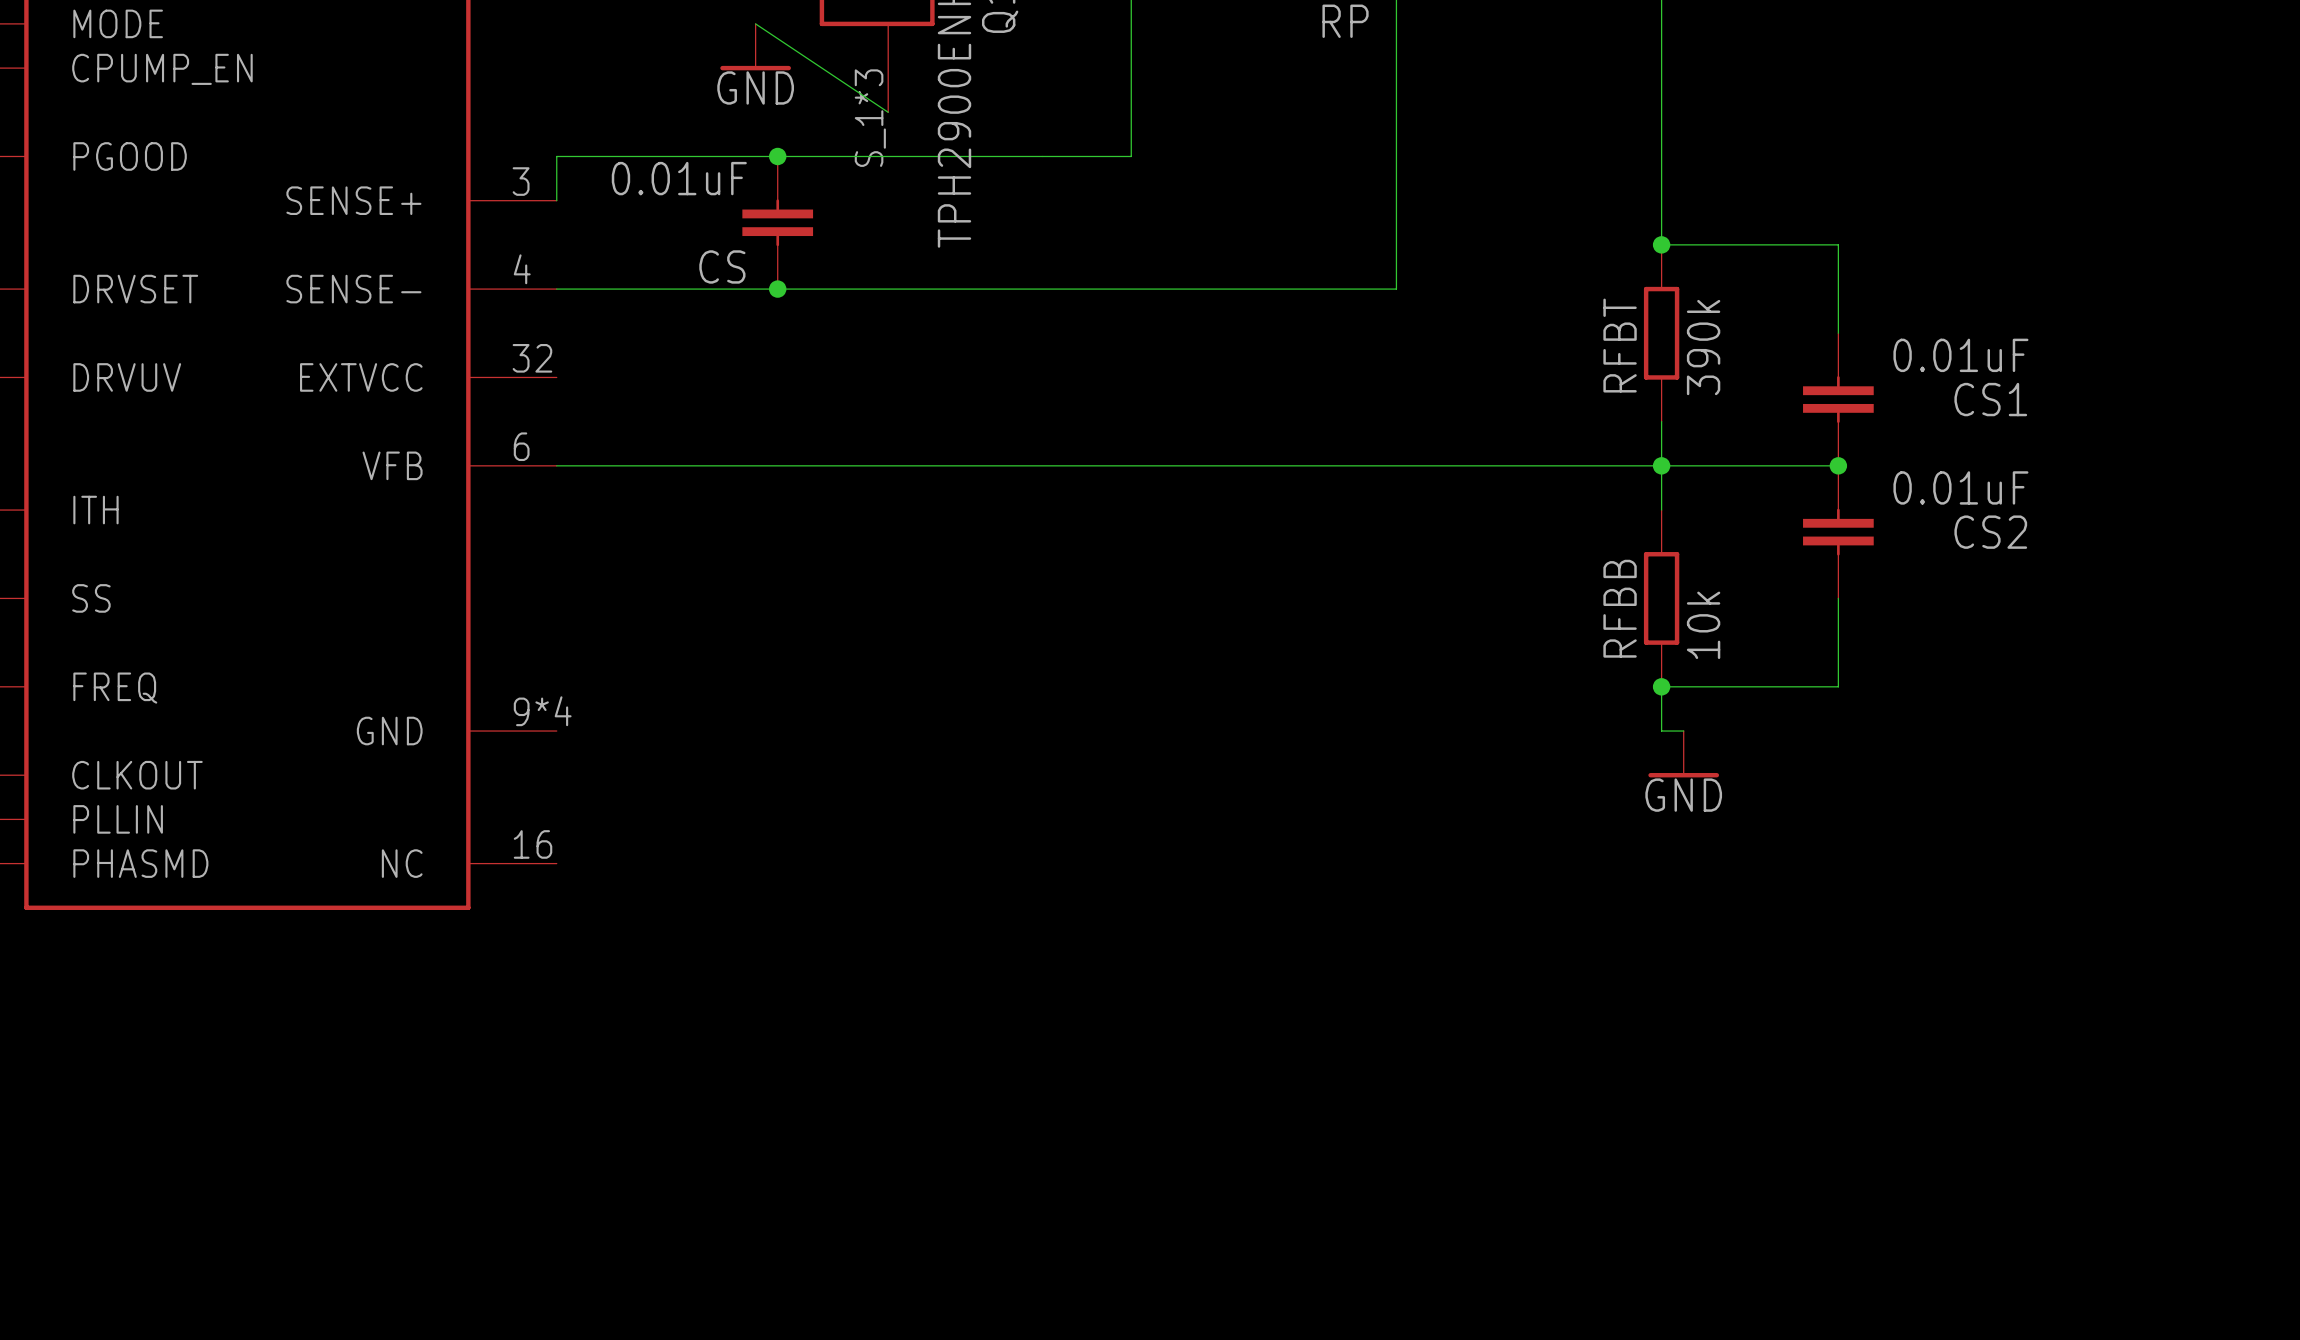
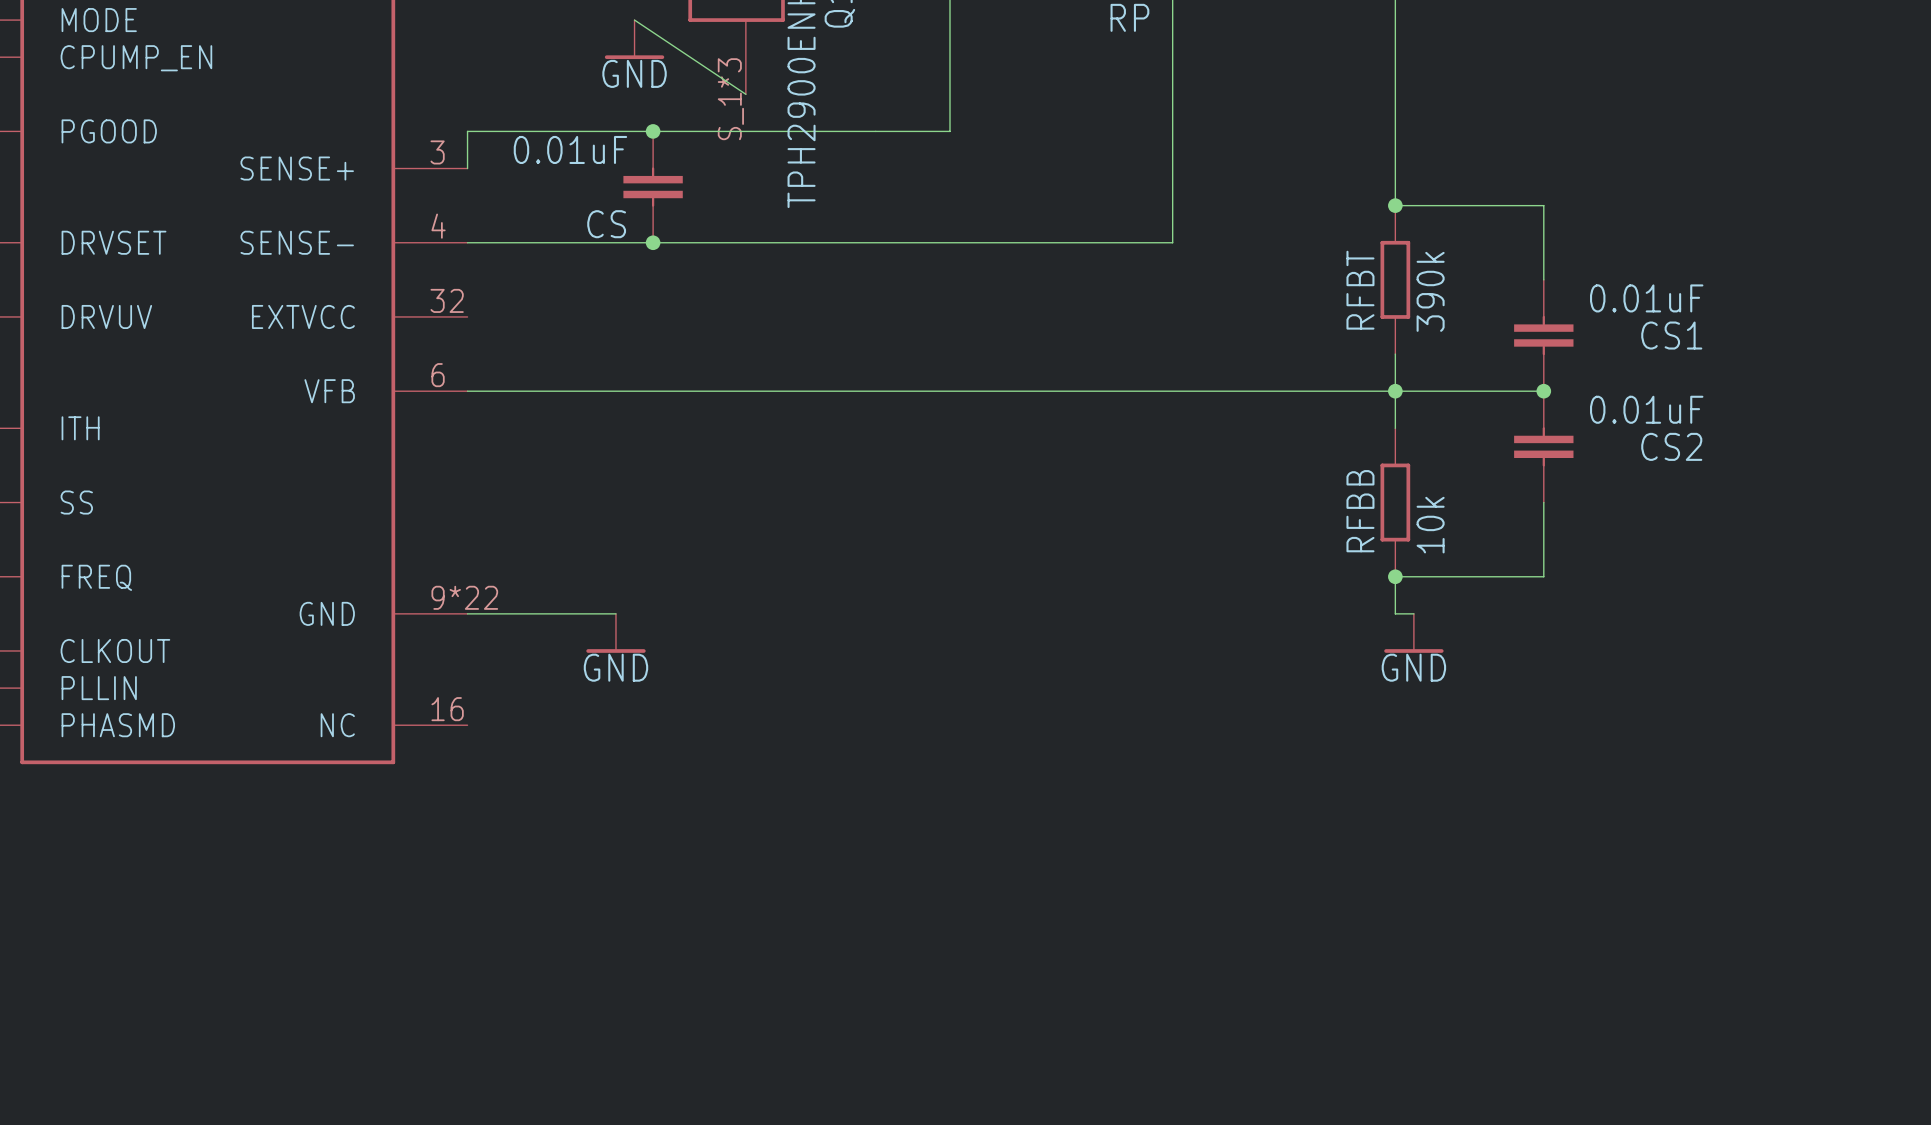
part pin number: 9*4 (542, 711) -> 9*22 (464, 597)
wire: none -> (467, 613) (615, 613)
power symbol: none -> GND (615, 633)

